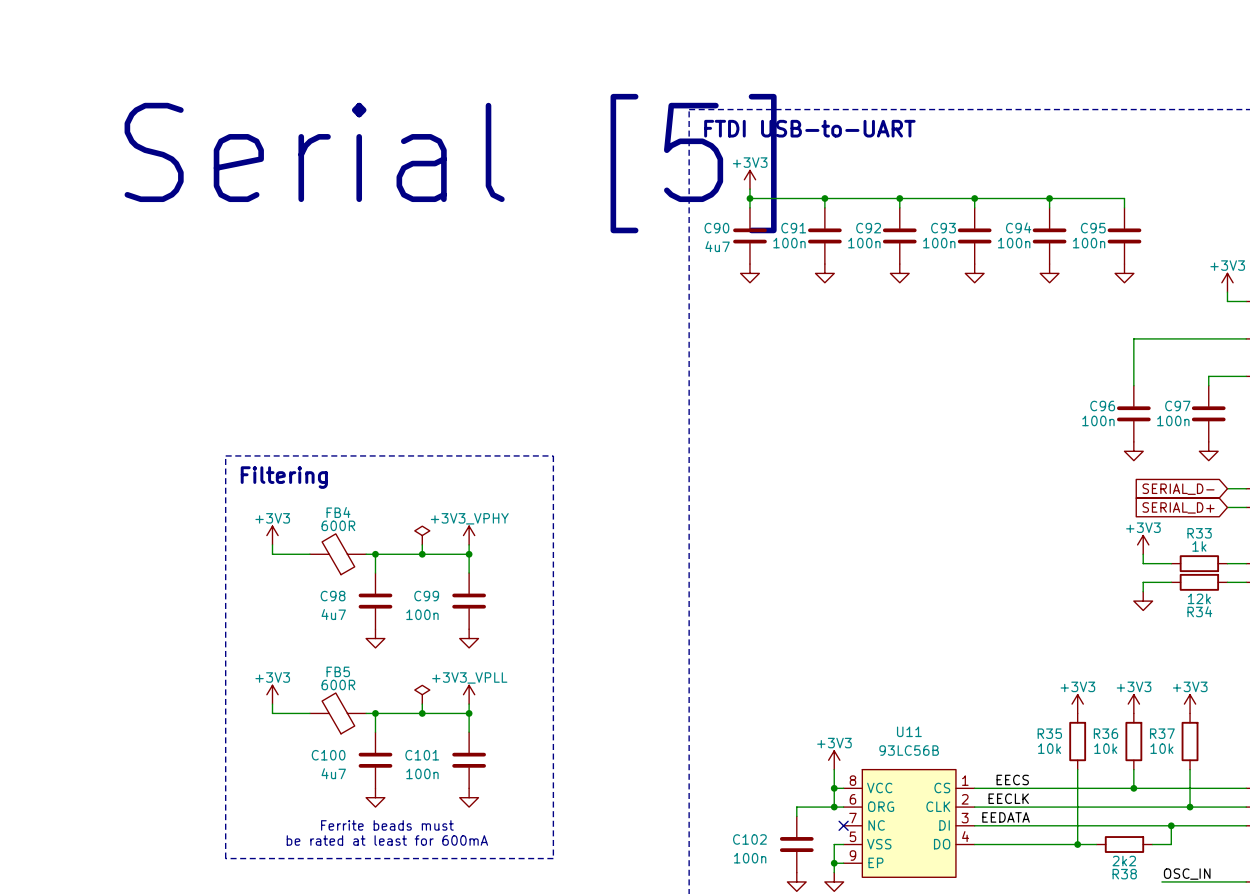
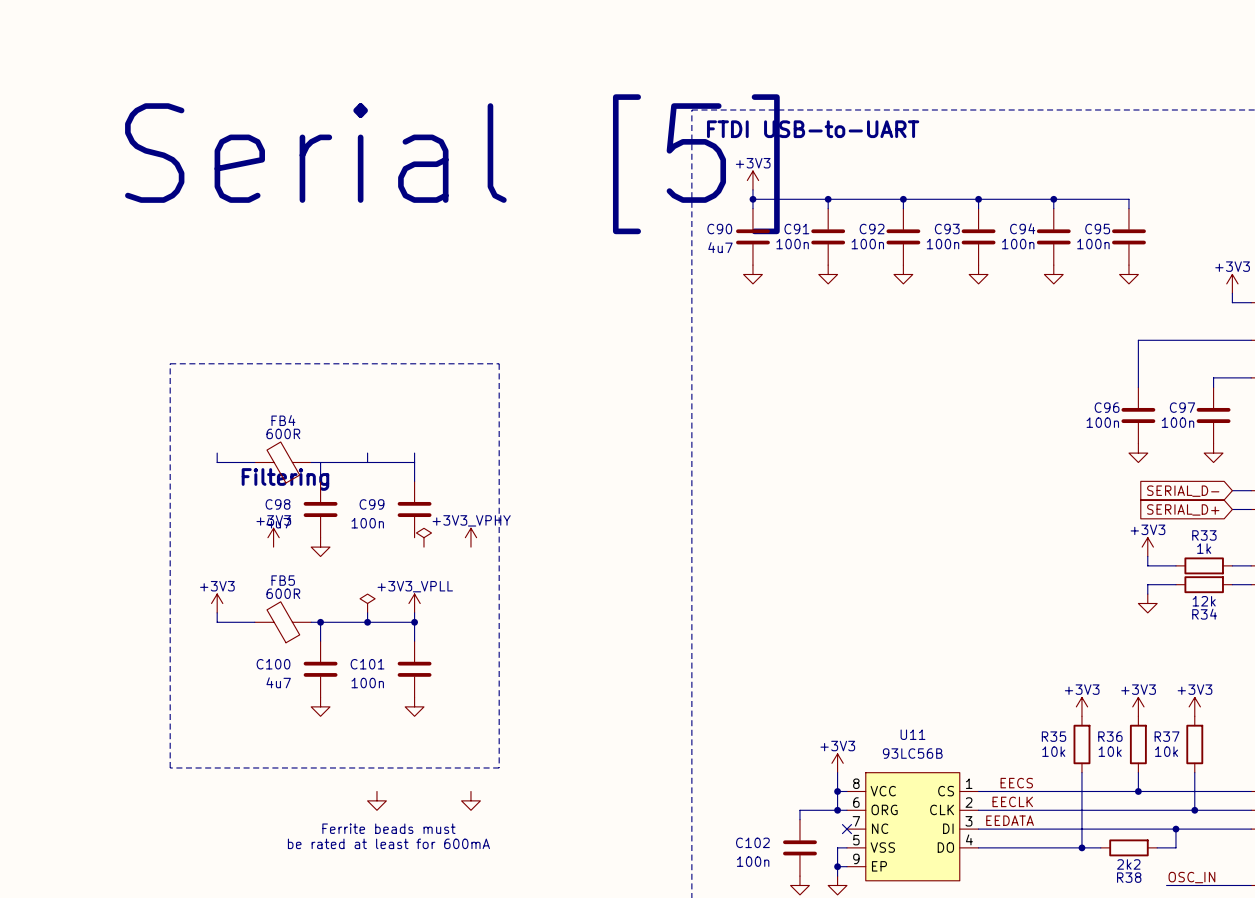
line: (225, 455) (553, 455) (553, 858) (225, 858) (225, 455) -> (170, 363) (499, 363) (499, 767) (170, 767) (170, 363)
wire: (272, 544) (272, 554) (309, 554) -> (217, 453) (217, 462) (254, 462)
power symbol: none -> (320, 547)
wire: (422, 544) (422, 554) -> (367, 453) (367, 462)
wire: (469, 544) (469, 573) -> (414, 453) (414, 481)
FB4 position: (338, 554) -> (282, 462)
wire: (366, 554) (469, 554) -> (311, 462) (414, 462)
wire: (375, 554) (375, 573) -> (320, 462) (320, 481)
junction: (375, 554) -> none
junction: (422, 554) -> none
junction: (469, 554) -> none
C98 position: (375, 601) -> (320, 509)
C99 position: (469, 601) -> (414, 509)
junction: none -> (320, 622)
junction: none -> (367, 622)
junction: none -> (414, 622)
power symbol: (375, 638) -> none
power symbol: (469, 638) -> none
power symbol position: +3V3 (272, 694) -> +3V3 (217, 603)
power symbol position: (422, 694) -> (367, 603)
power symbol position: +3V3_VPLL (469, 694) -> +3V3_VPLL (414, 603)
wire: (272, 704) (272, 713) (309, 713) -> (217, 612) (217, 622) (254, 622)
power symbol: none -> (320, 706)
power symbol: none -> (414, 706)
wire: (422, 704) (422, 713) -> (367, 612) (367, 622)
wire: (469, 704) (469, 732) -> (414, 612) (414, 641)
FB5 position: (338, 713) -> (282, 622)
wire: (366, 713) (469, 713) -> (311, 622) (414, 622)
wire: (375, 713) (375, 732) -> (320, 622) (320, 641)
junction: (375, 713) -> none
junction: (422, 713) -> none
junction: (469, 713) -> none
C100 position: (375, 760) -> (320, 669)
C101 position: (469, 760) -> (414, 669)

